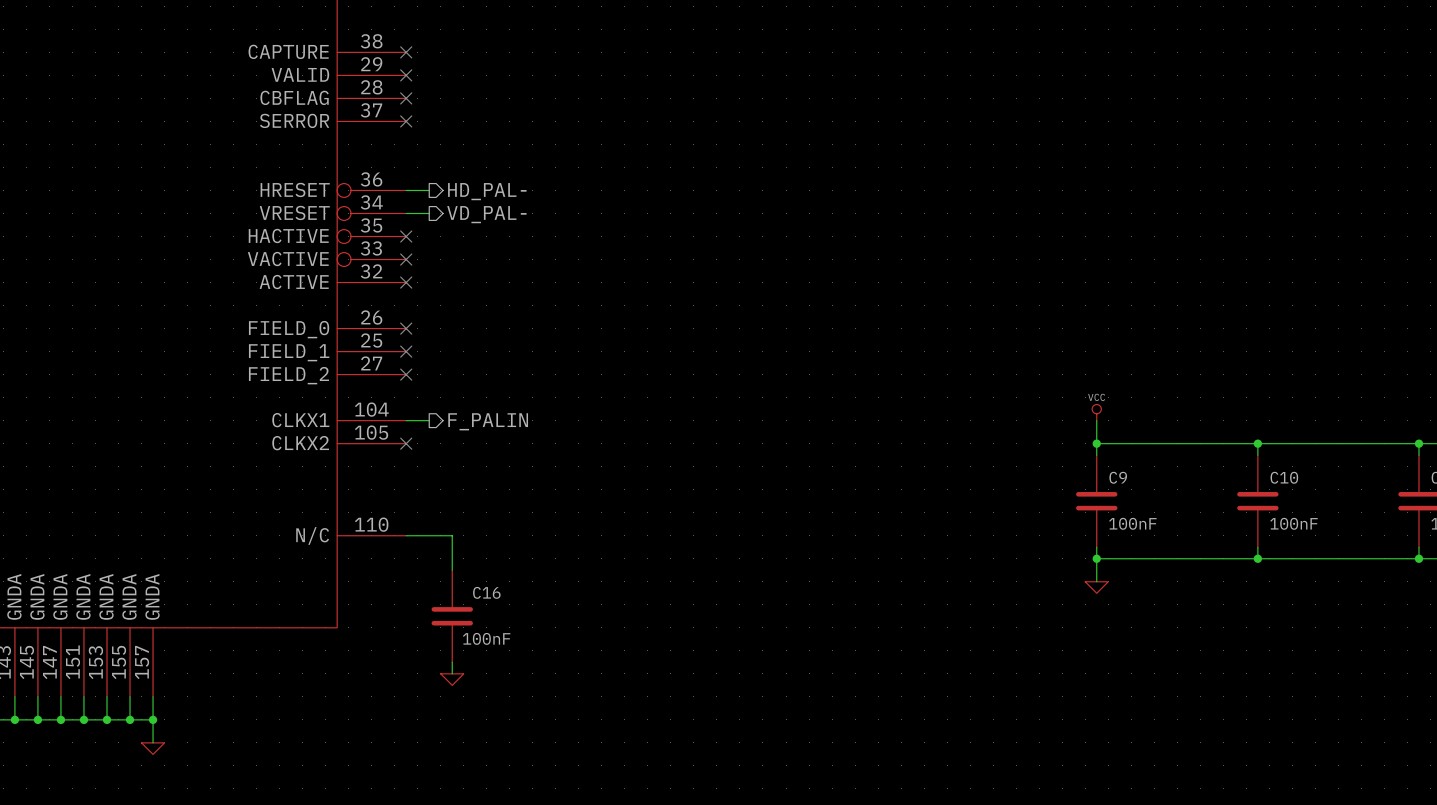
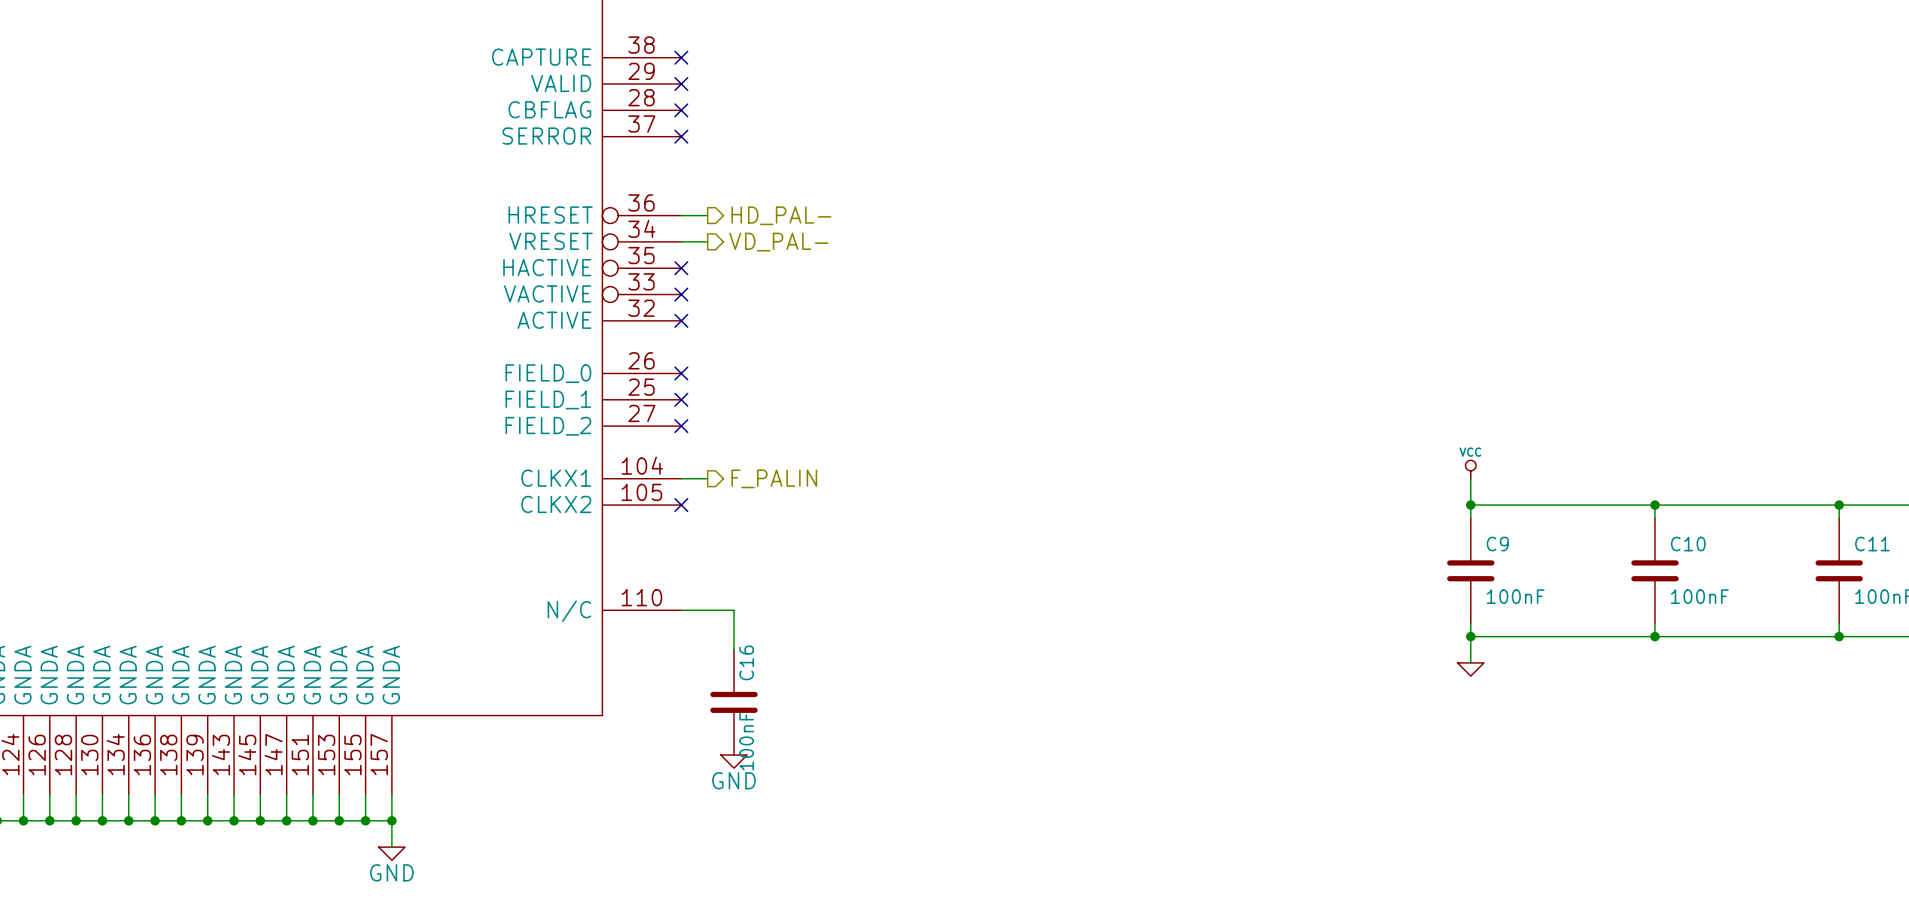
C16 name rotation: 0° (486, 592) -> 90° counterclockwise (746, 662)
C16 value rotation: 0° (486, 638) -> 90° counterclockwise (746, 741)
wire: (452, 662) (452, 673) -> none
power symbol: none -> GND (733, 761)
power symbol: (452, 679) -> none
power symbol text: none -> GND (391, 872)

